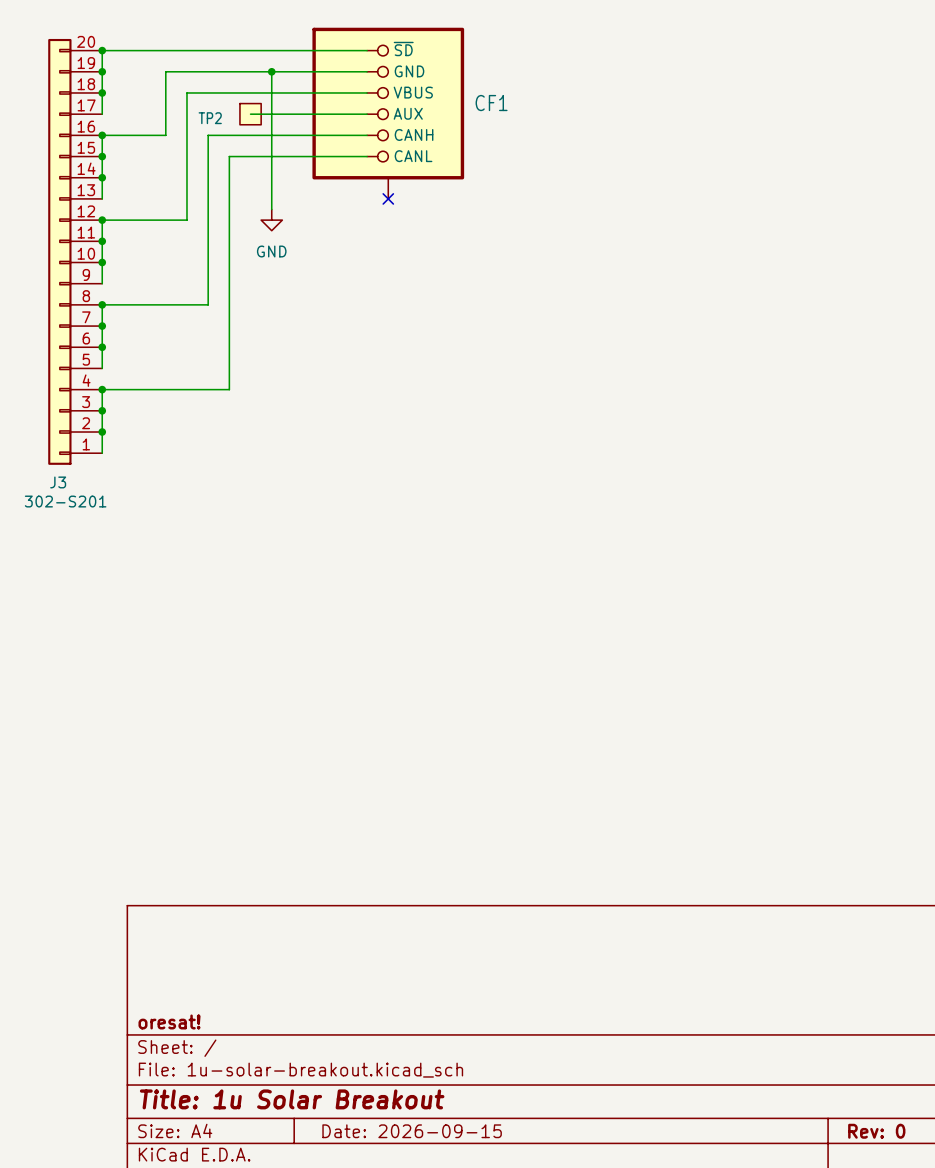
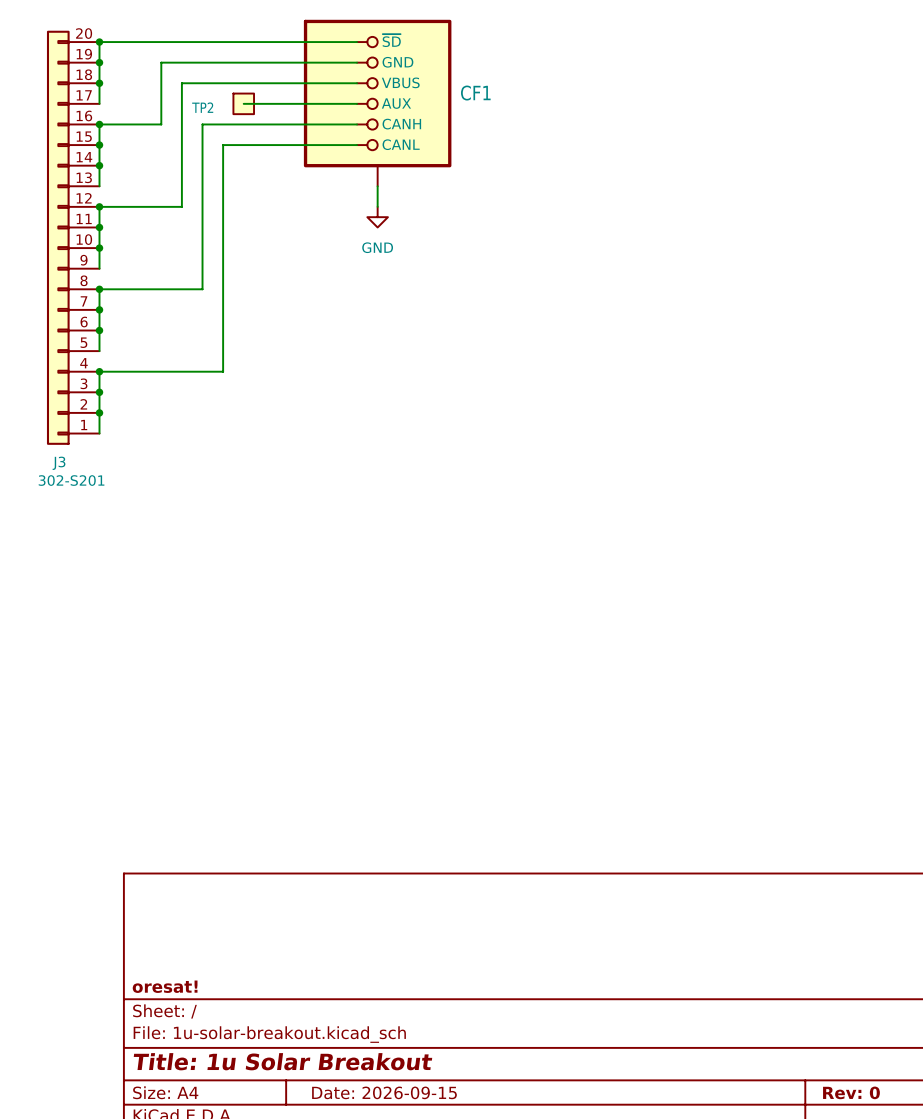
wire: (271, 71) (271, 209) -> none
junction: (271, 71) -> none
wire: none -> (377, 186) (377, 206)
no-connect mark: (388, 198) -> none
power symbol position: GND (271, 220) -> GND (377, 217)

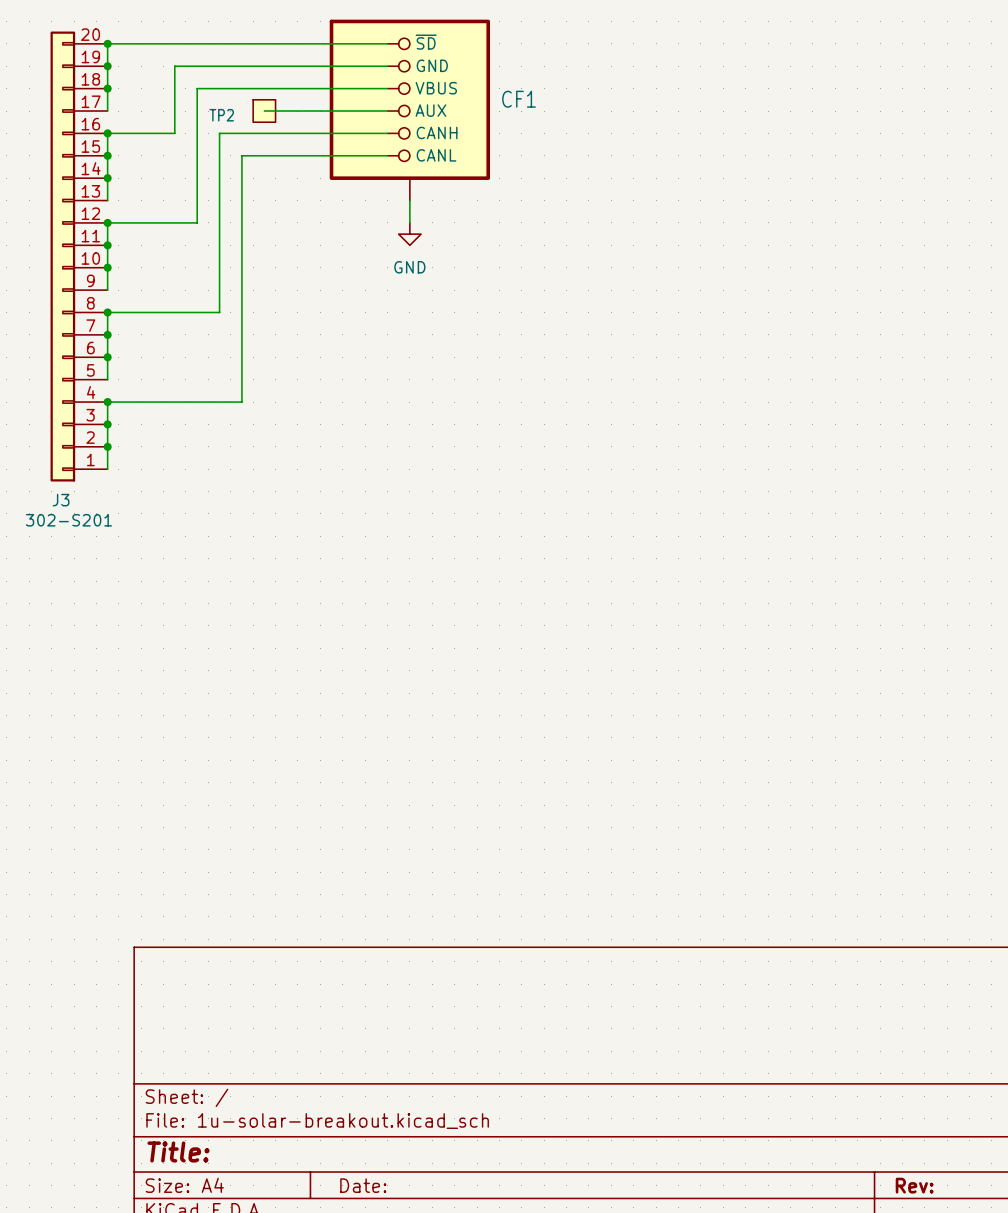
title block: oresat! (165, 986) -> none
title block: Title: 1u Solar Breakout (282, 1061) -> Title: (178, 1151)
title block: Date: 2026-09-15 (384, 1092) -> Date: (363, 1185)
title block: Rev: 0 (851, 1092) -> Rev: (914, 1185)

